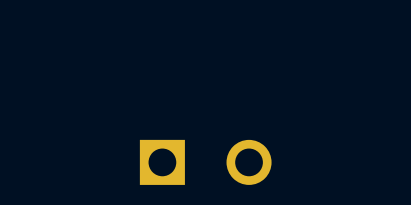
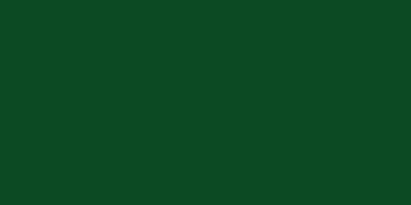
part: (205, 162) -> none

